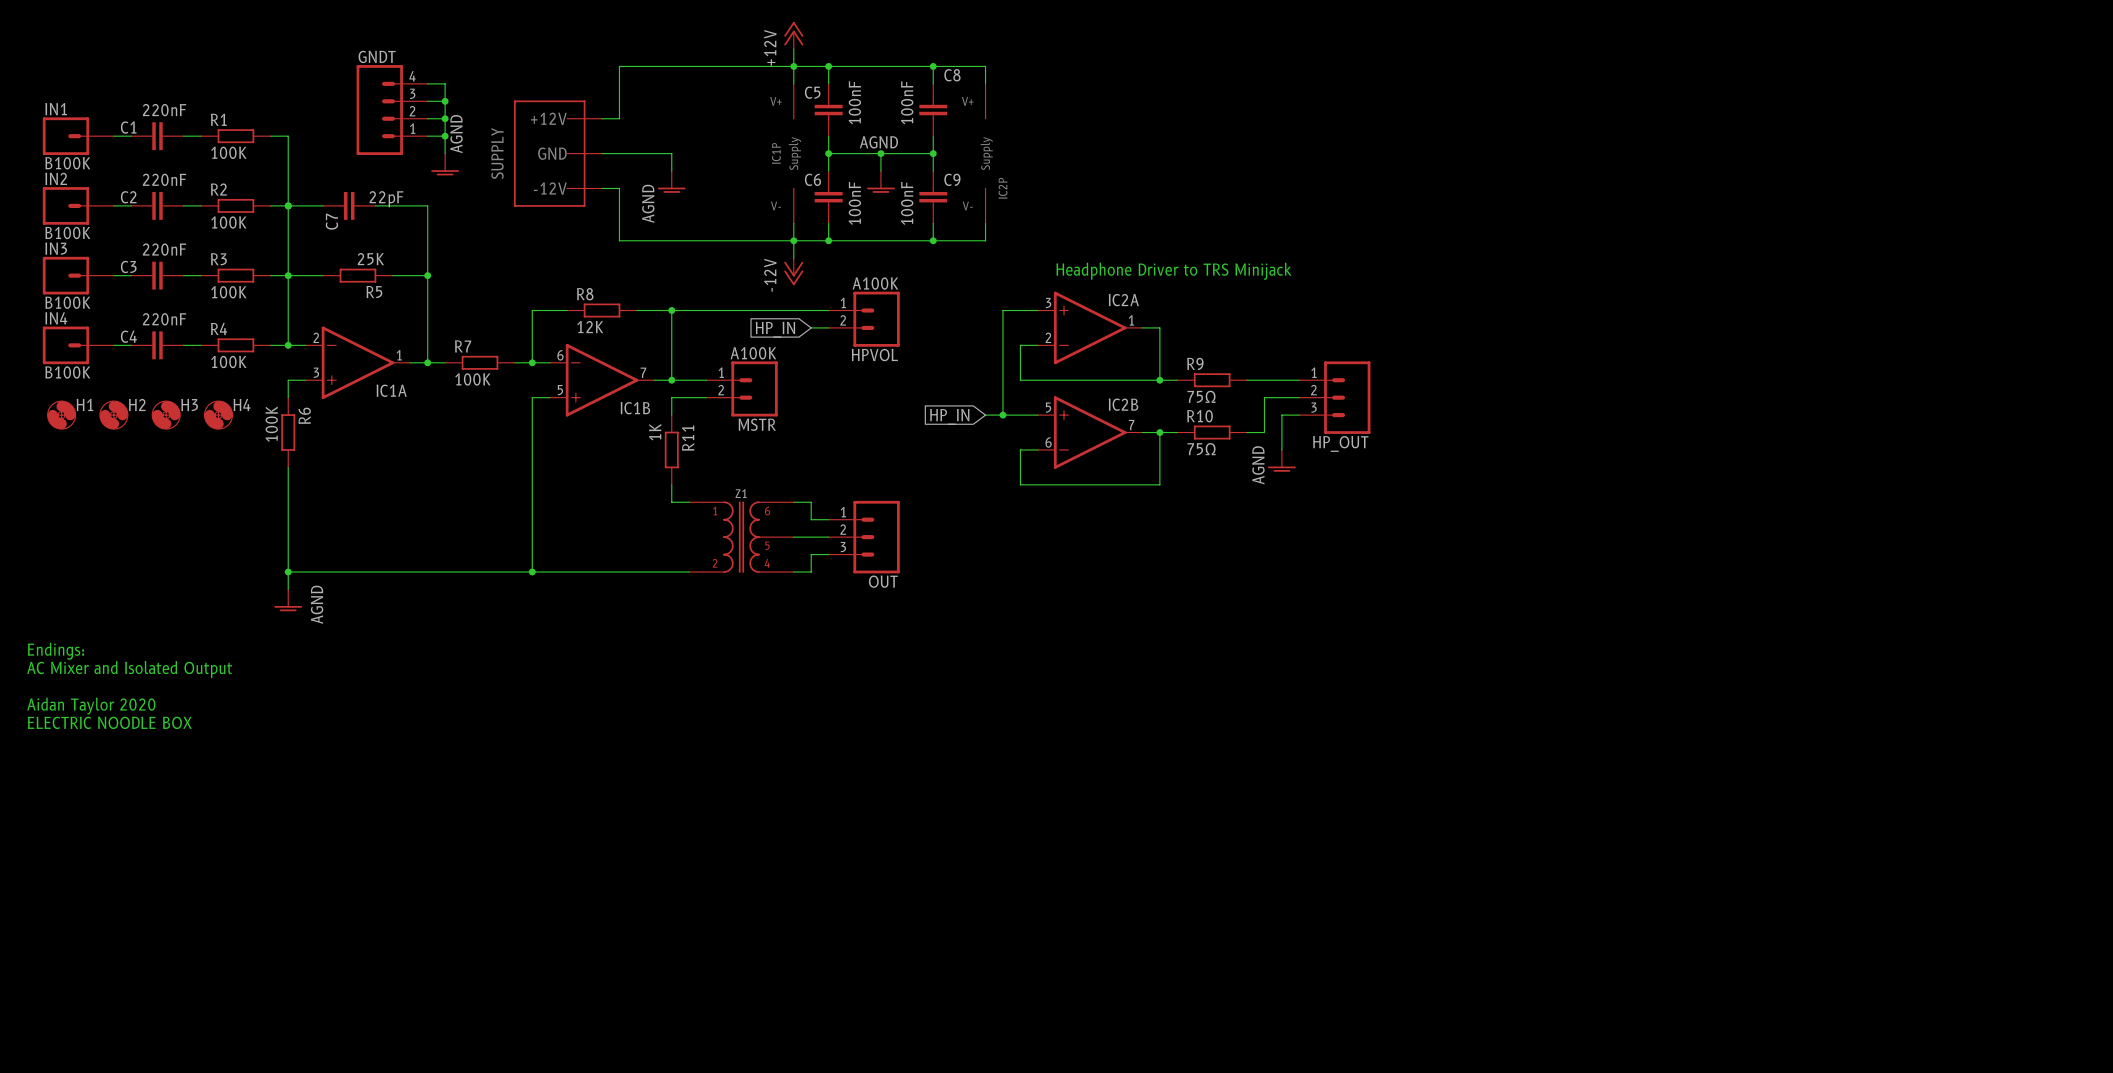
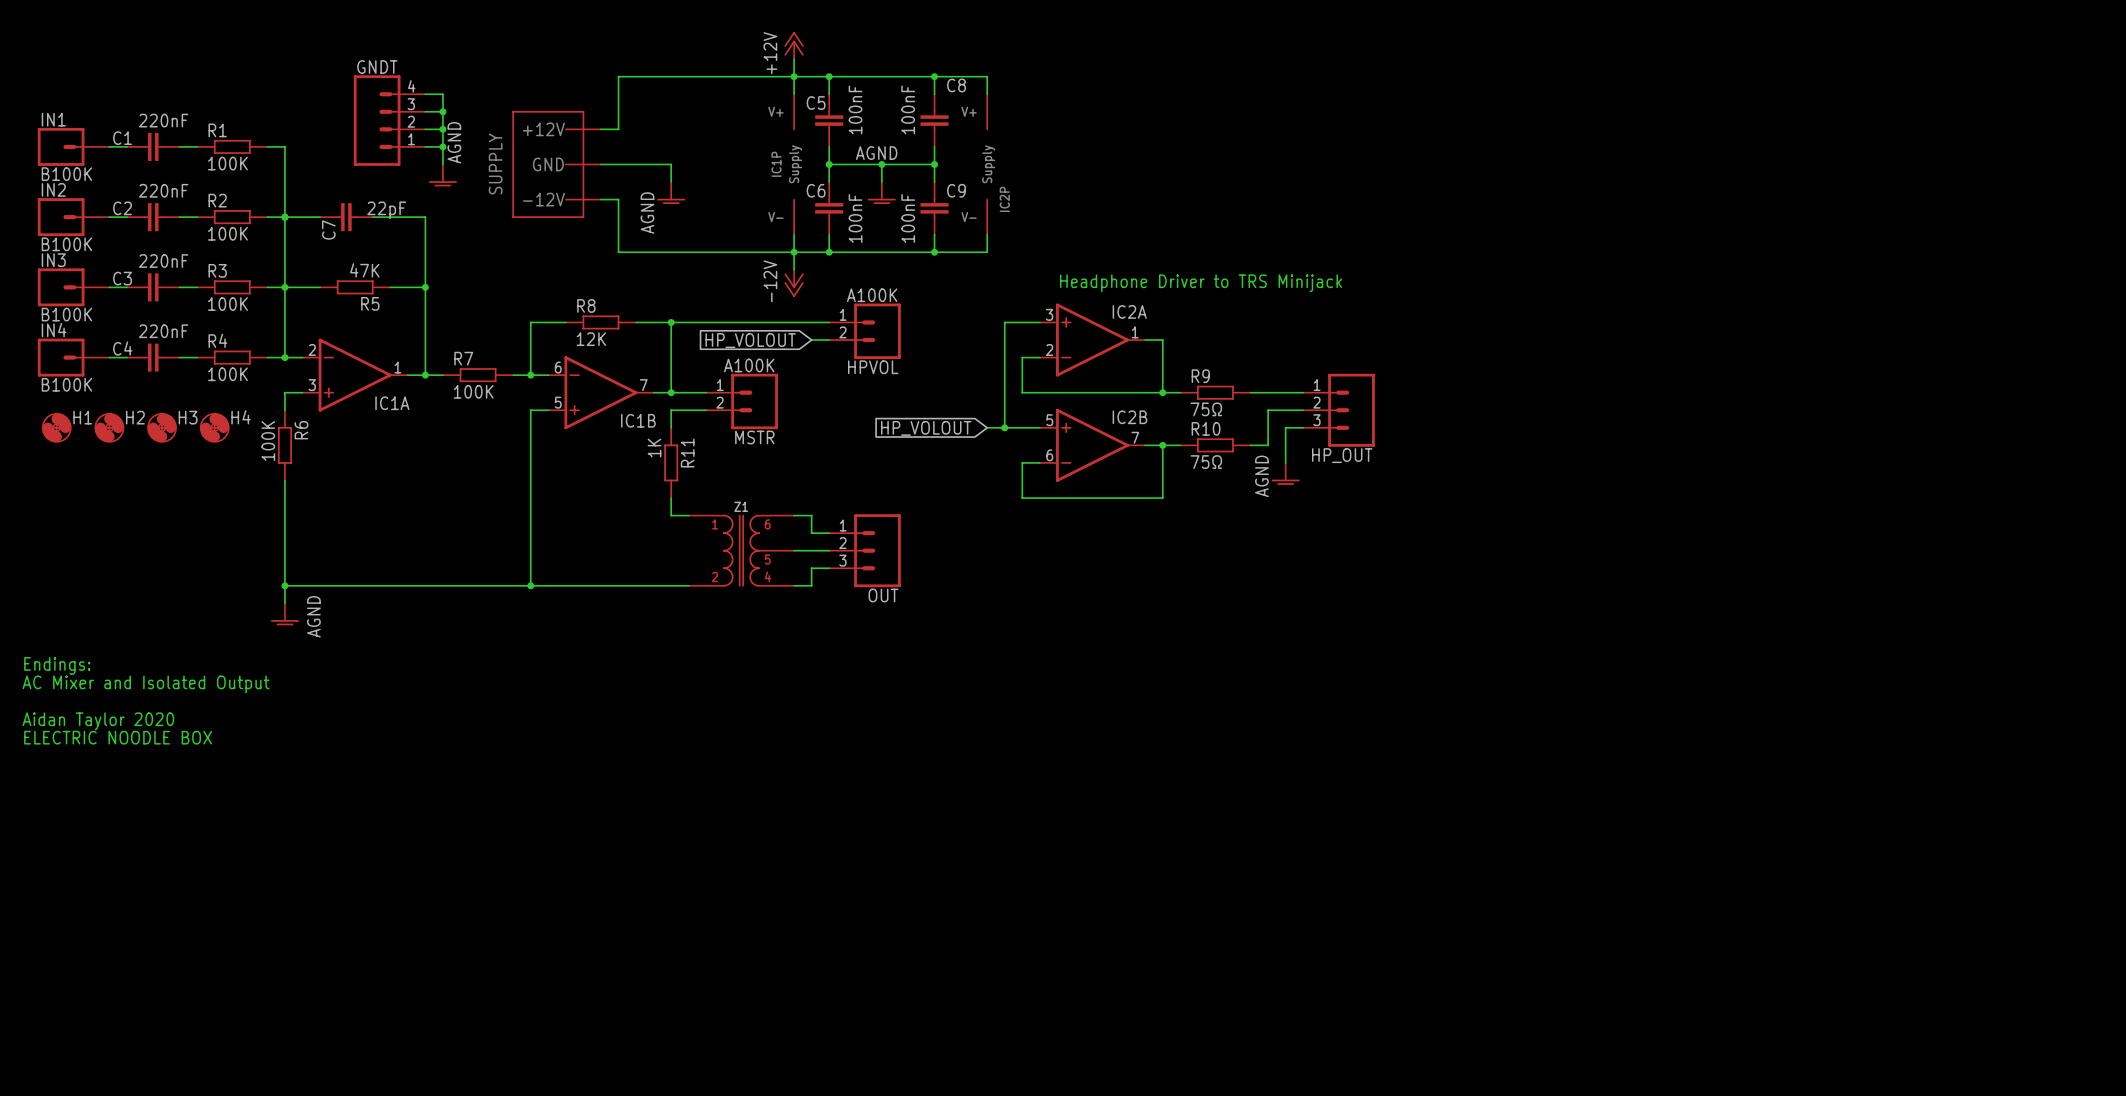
R5 value: 25K (370, 259) -> 47K (364, 270)
global label: HP_IN (775, 329) -> HP_VOLOUT (750, 340)
global label: HP_IN (949, 416) -> HP_VOLOUT (926, 428)

